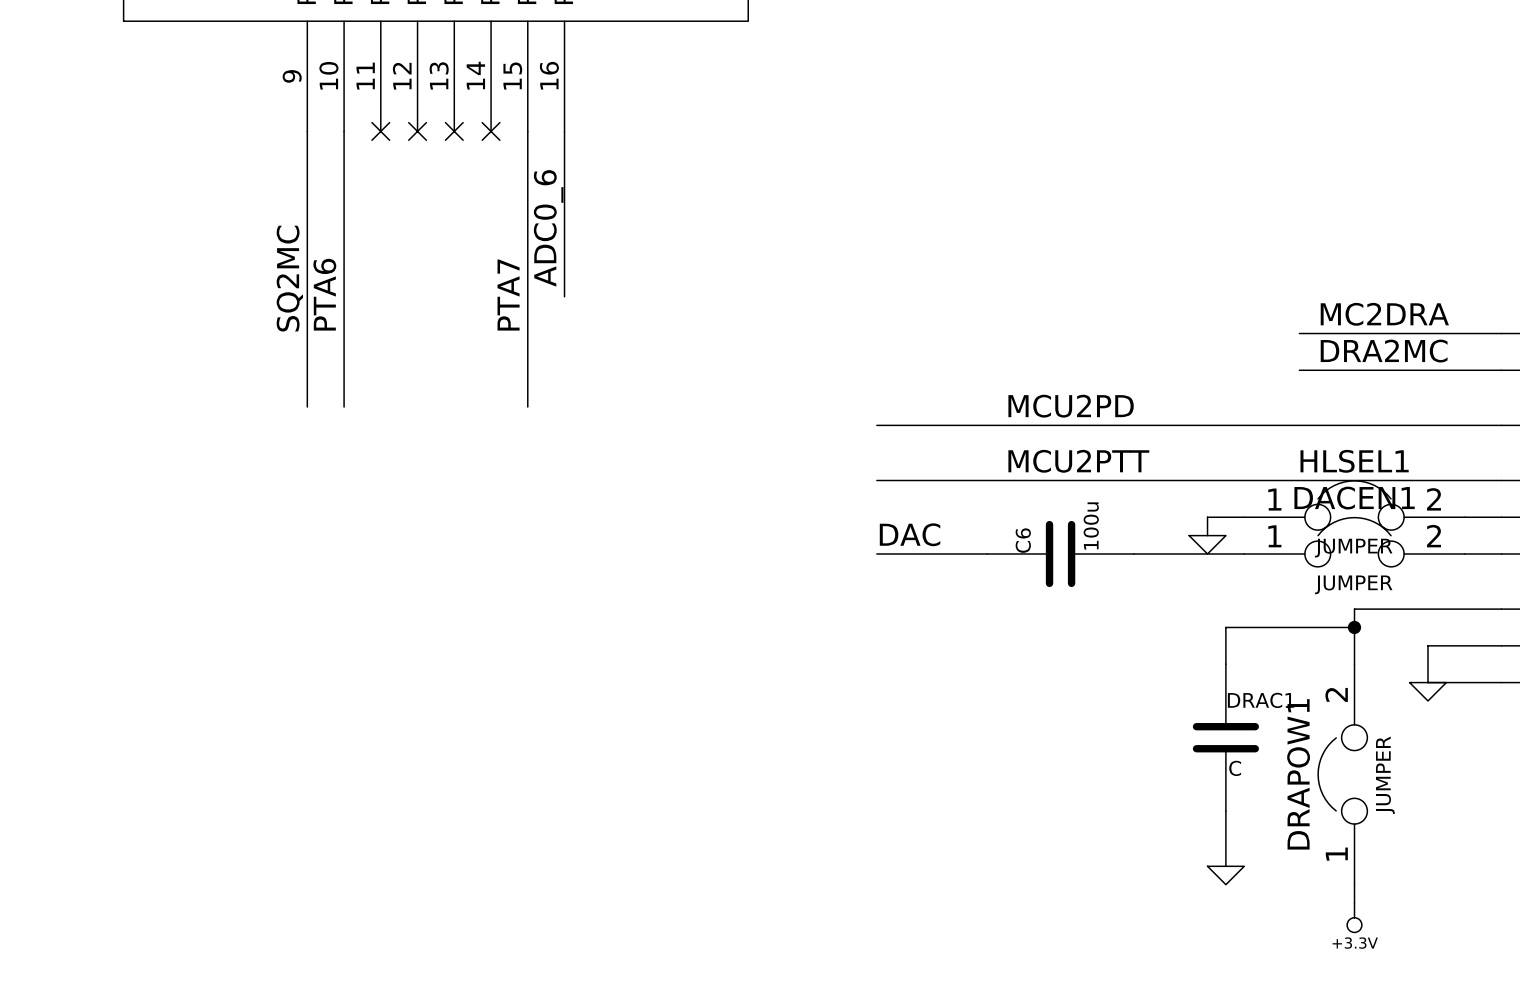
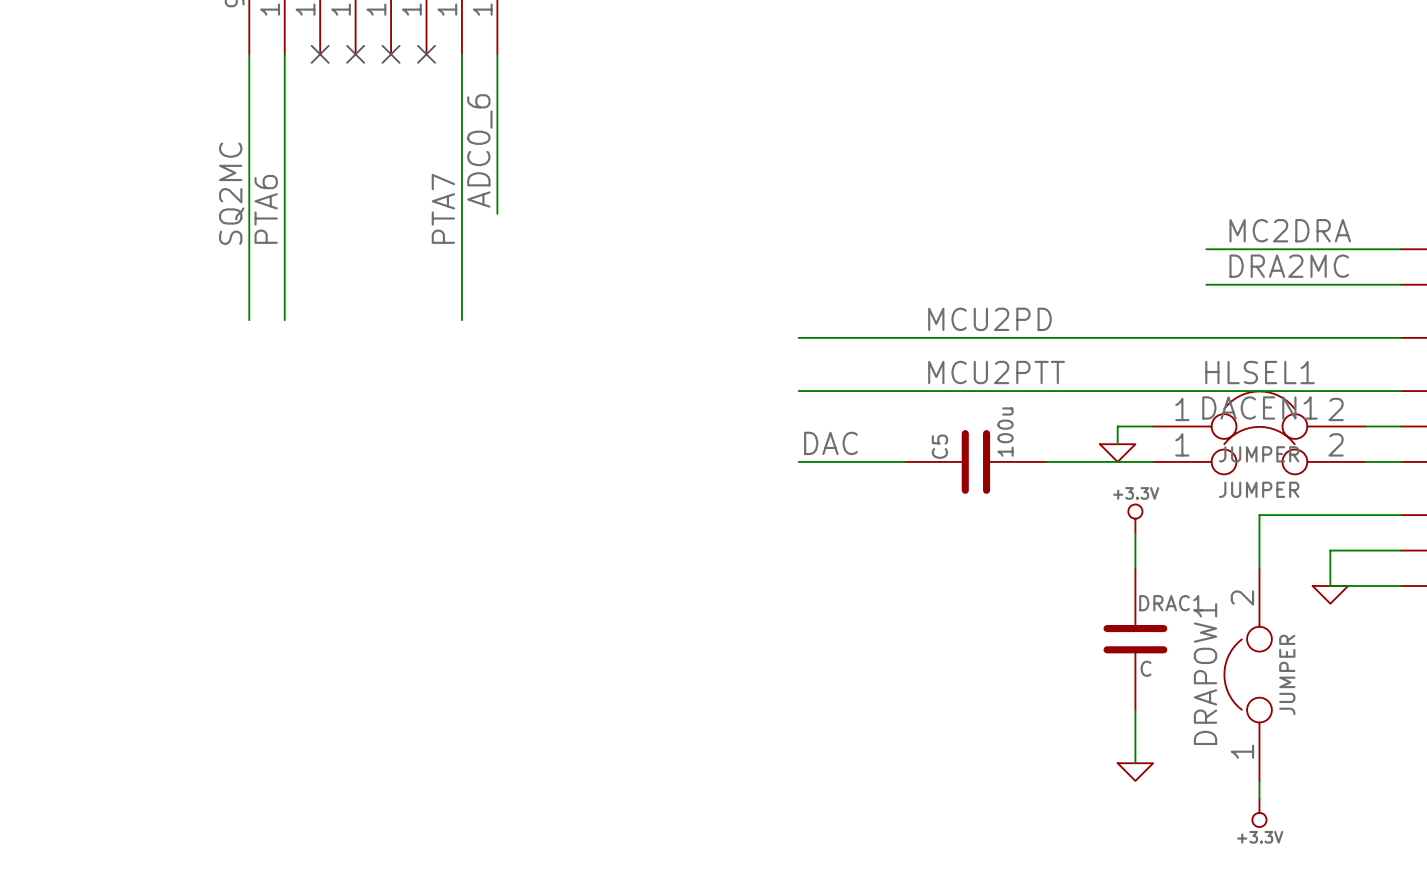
C6 name: C6 (1023, 540) -> C5 (939, 446)
power symbol: none -> +3.3V (1135, 518)
wire: (1225, 627) (1354, 627) -> none
junction: (1354, 627) -> none

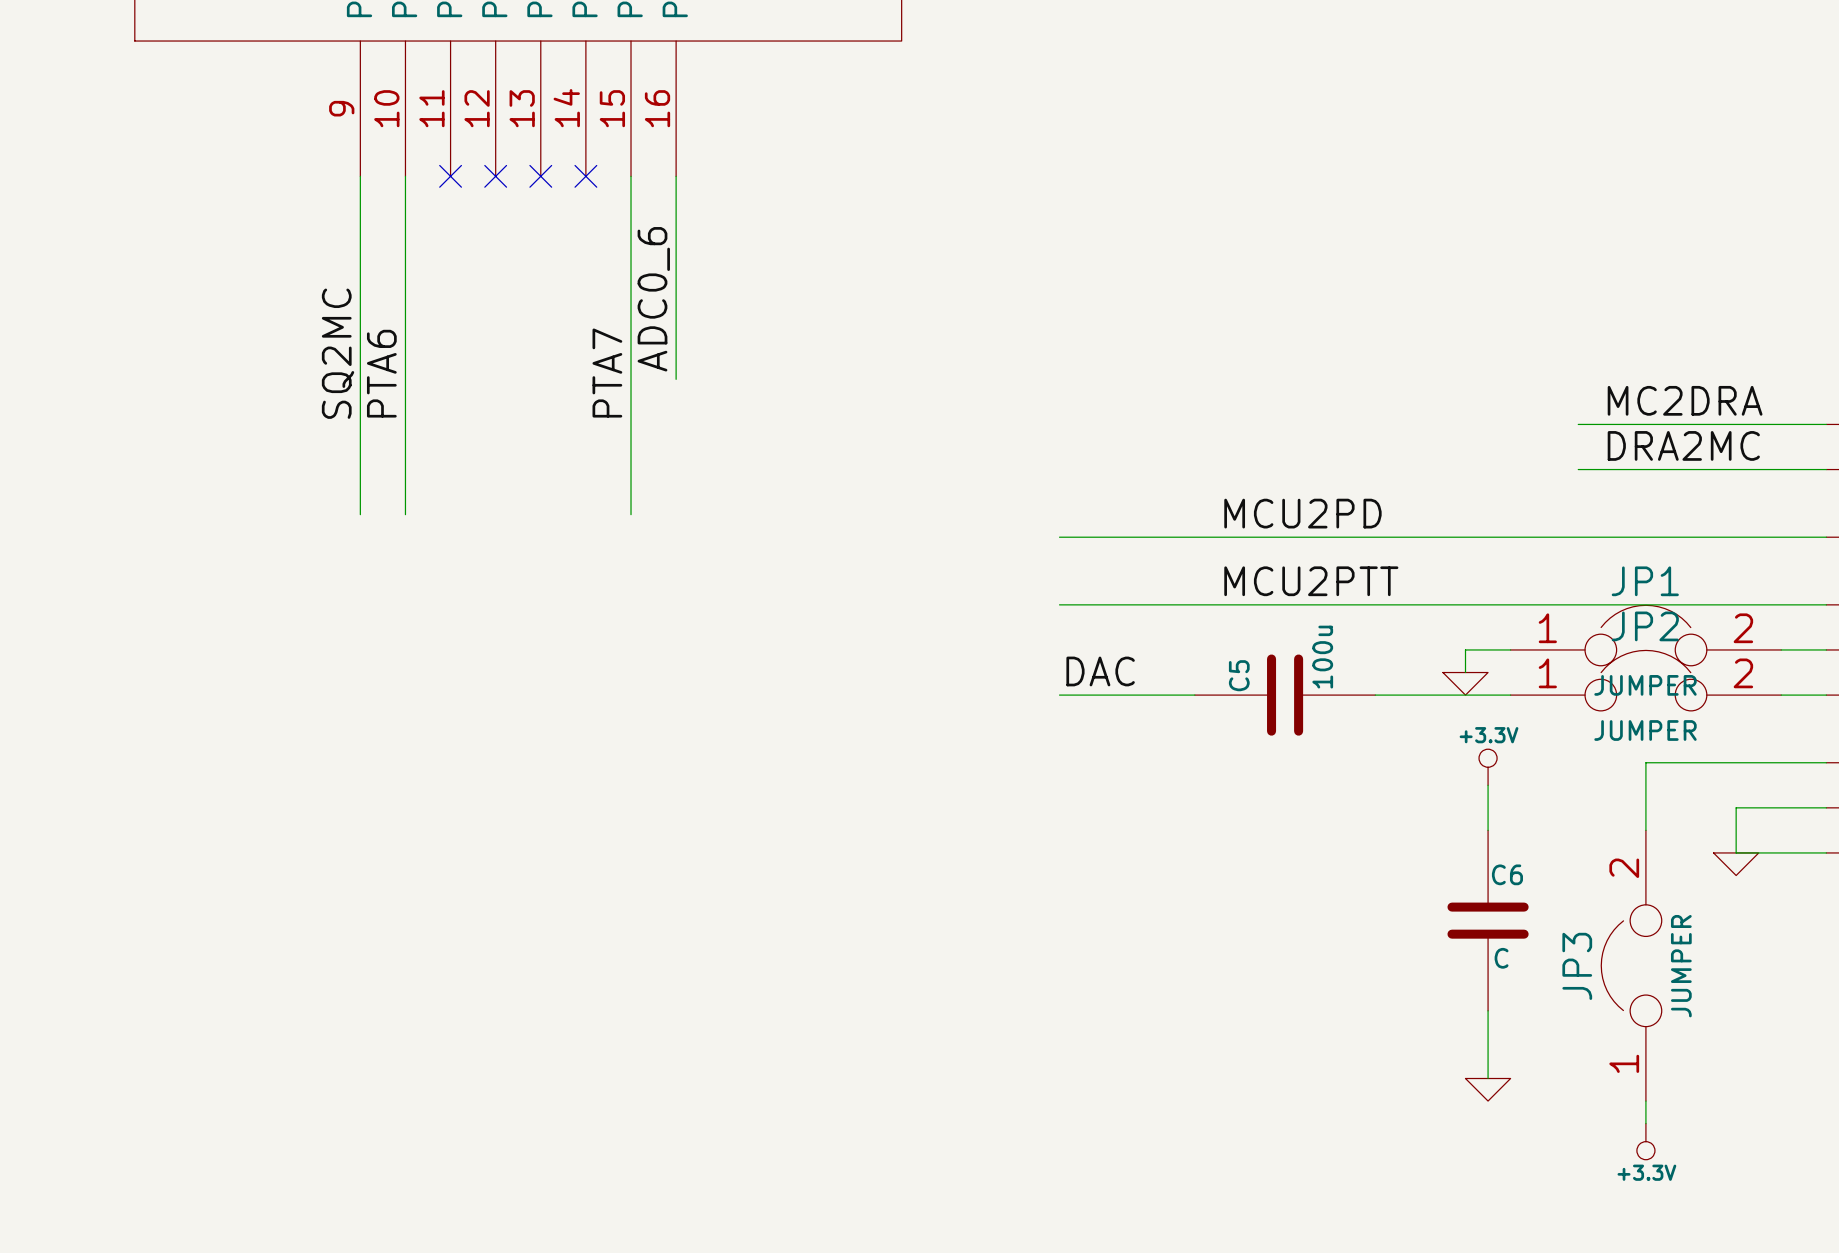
HLSEL1 name: HLSEL1 (1259, 372) -> JP1 (1645, 581)
DACEN1 name: DACEN1 (1259, 407) -> JP2 (1645, 626)
DRAC1 name: DRAC1 (1171, 603) -> C6 (1507, 874)
DRAPOW1 name: DRAPOW1 (1205, 674) -> JP3 (1577, 966)

